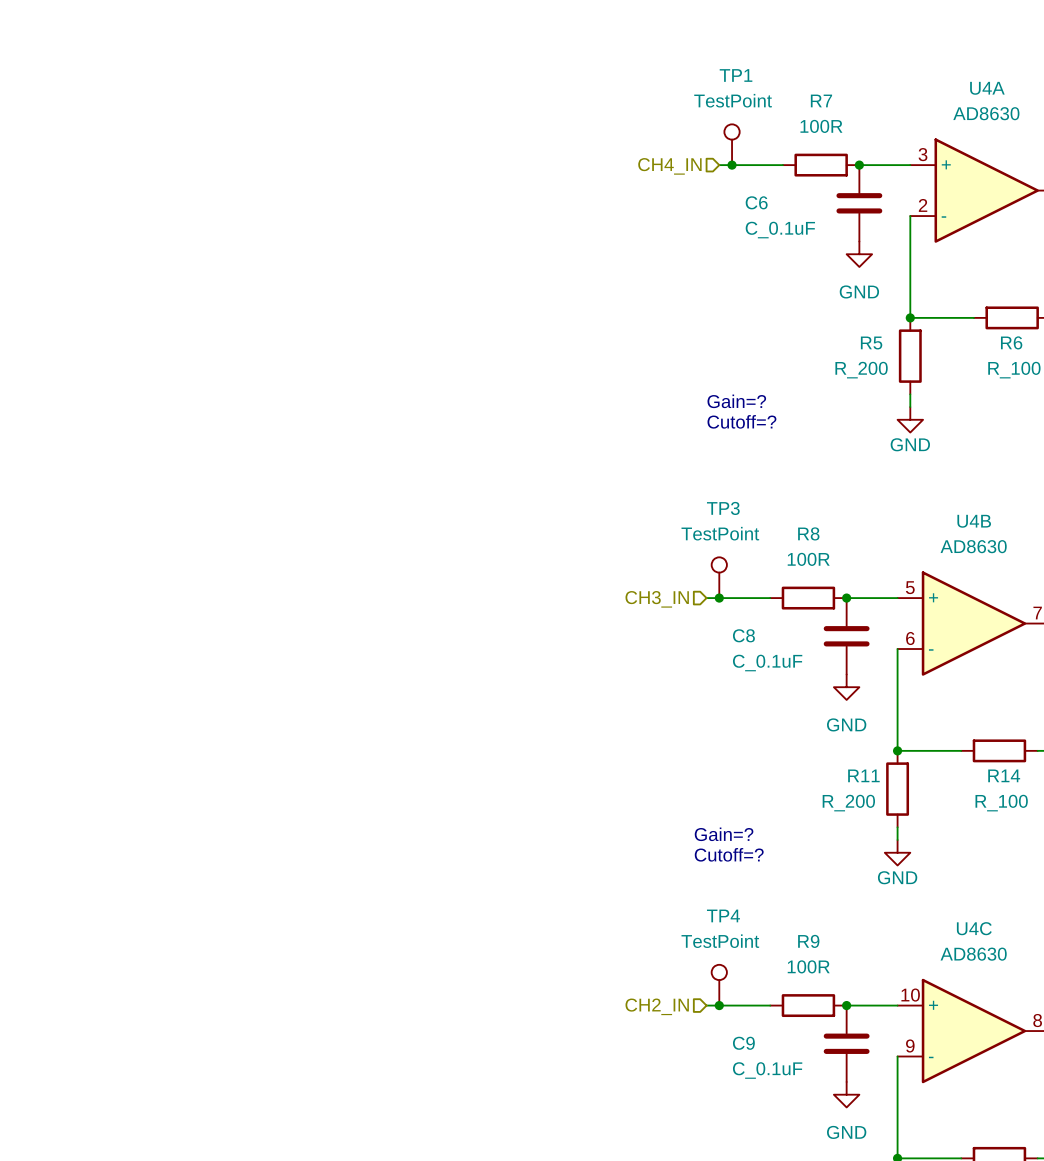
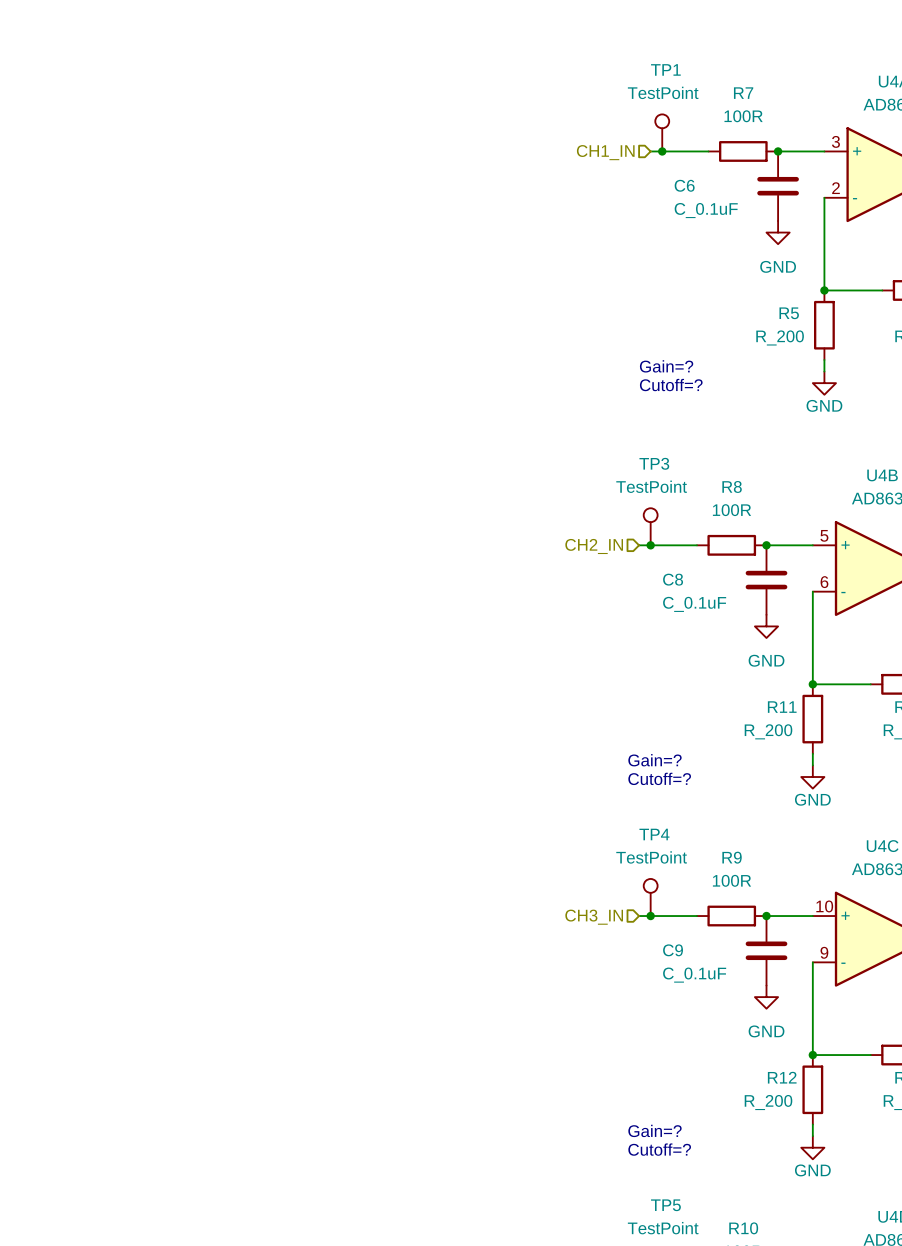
hierarchical label: CH4_IN (669, 166) -> CH1_IN (605, 152)
hierarchical label: CH3_IN (657, 599) -> CH2_IN (594, 546)
hierarchical label: CH2_IN (657, 1006) -> CH3_IN (594, 917)

